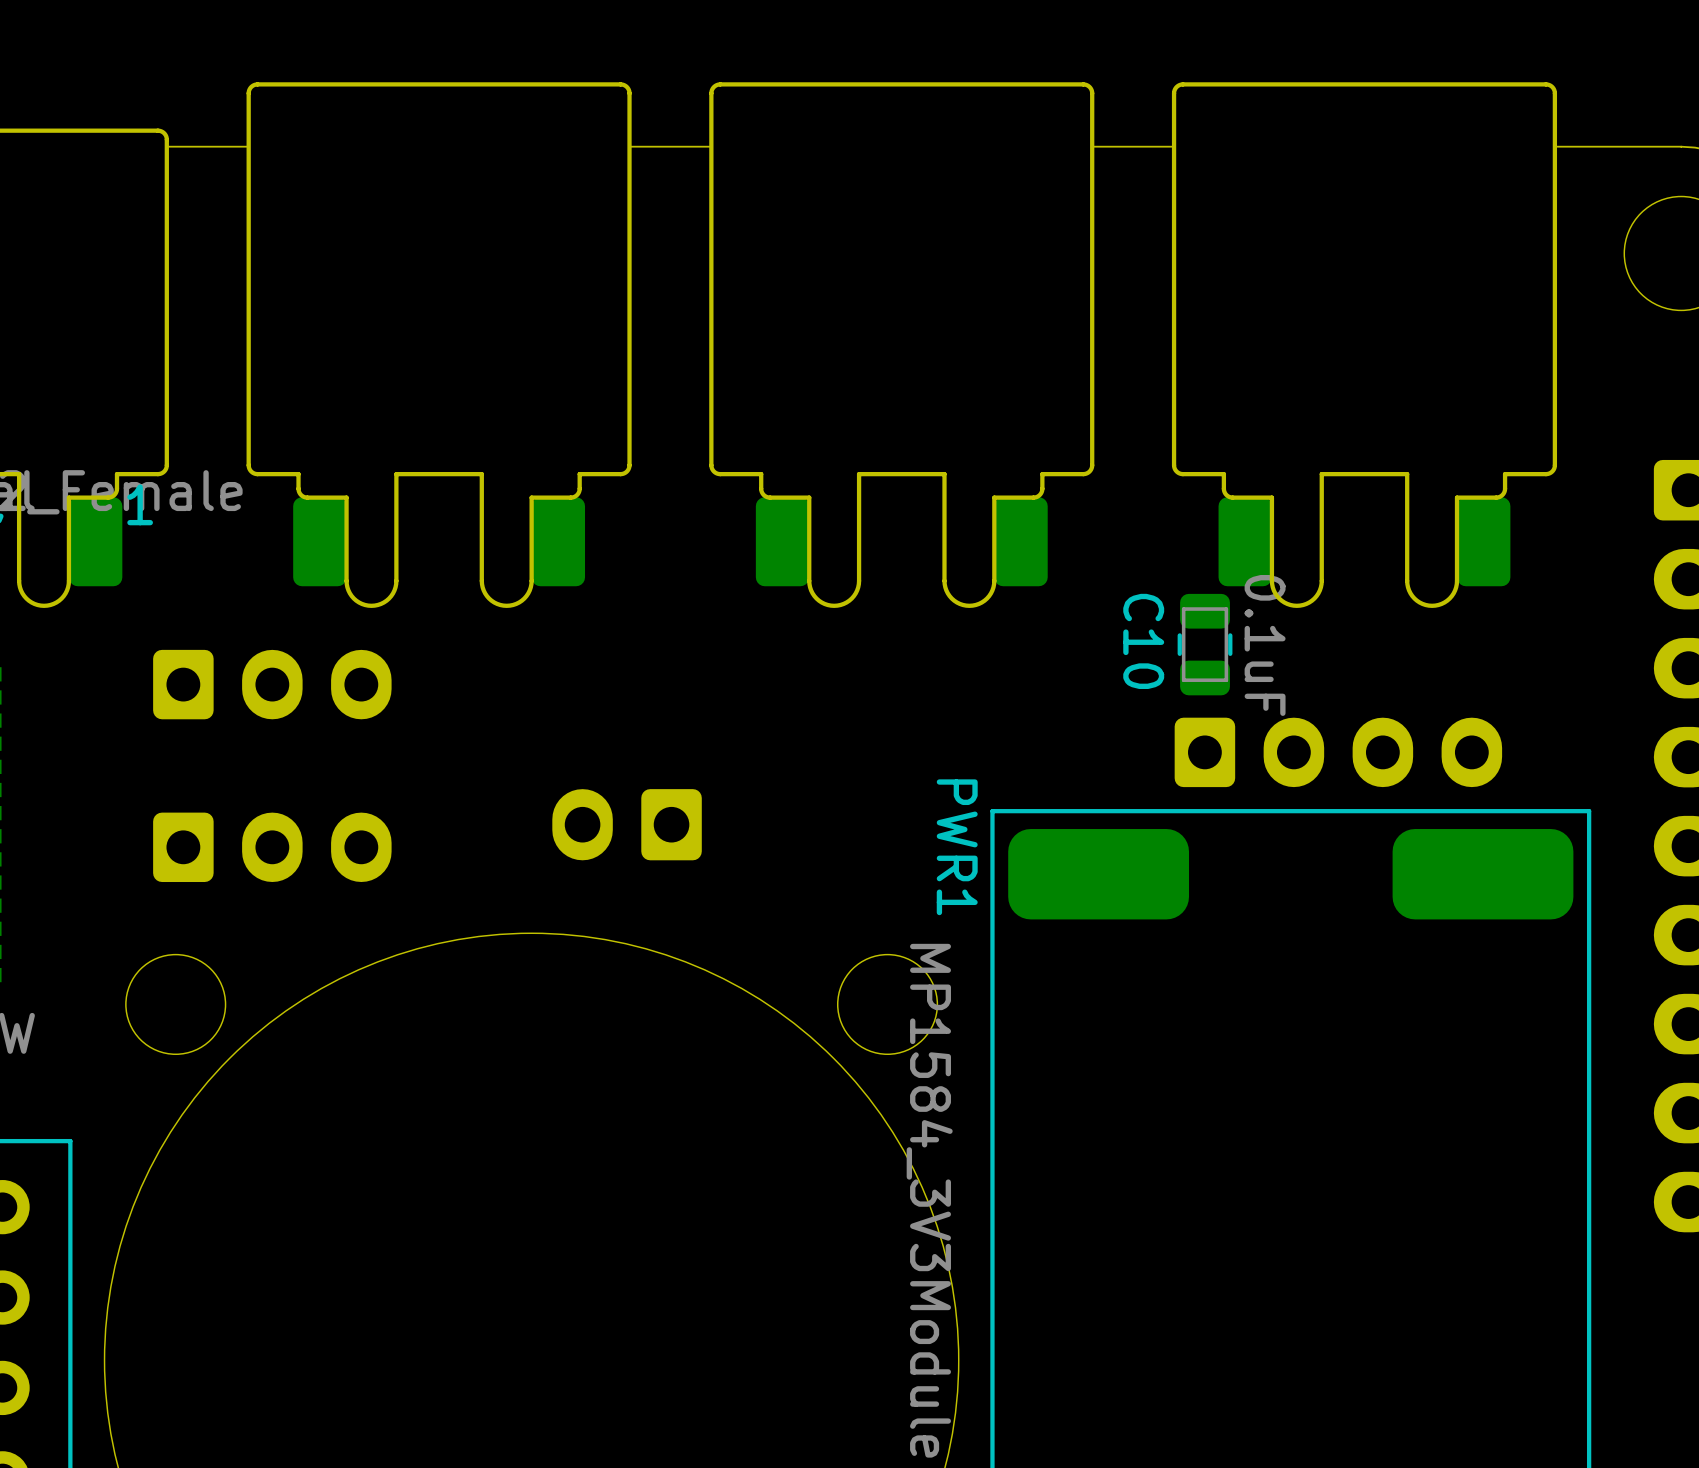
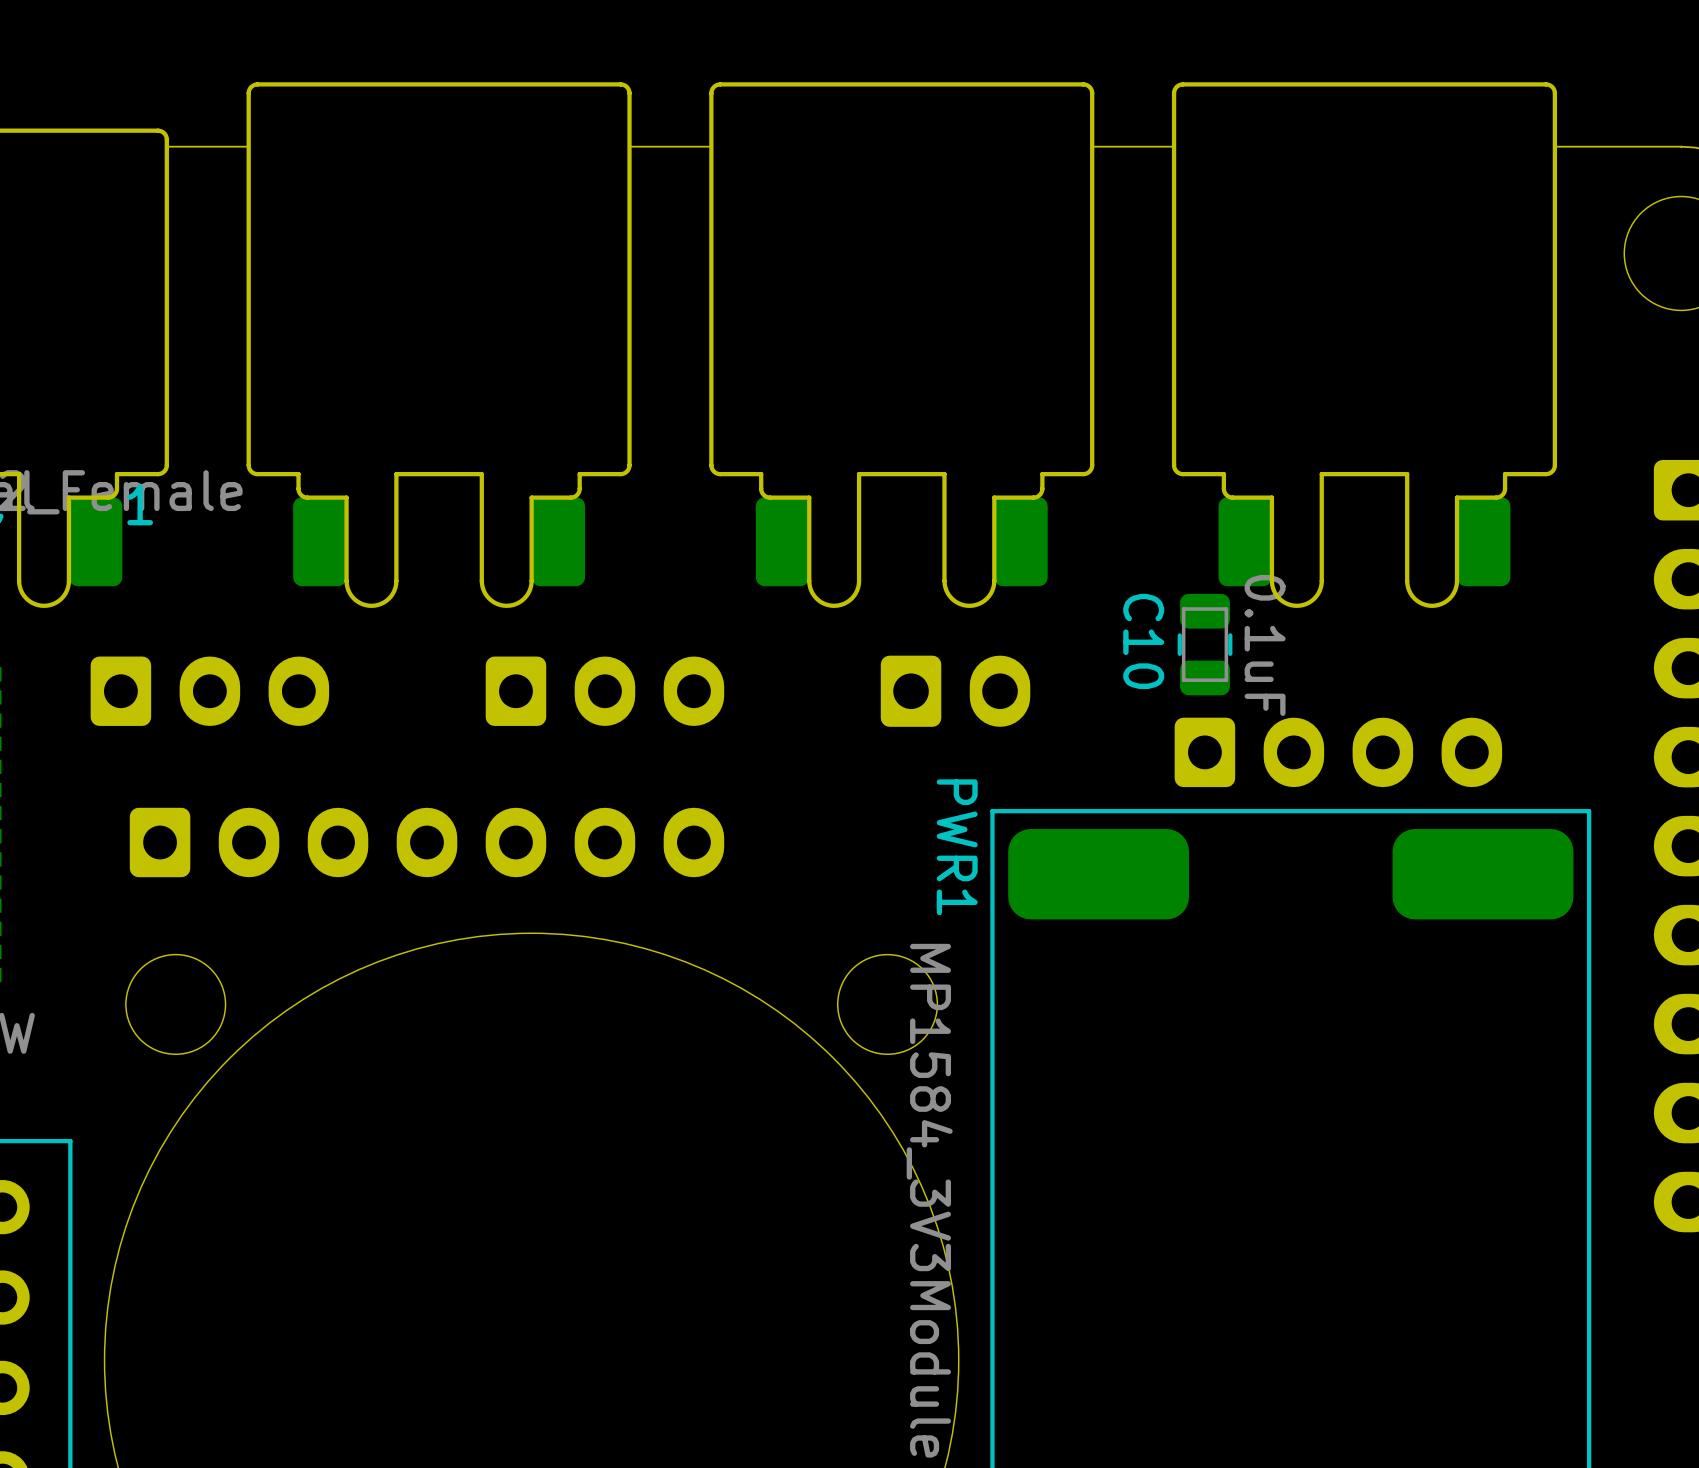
part position: (272, 684) -> (209, 691)
part: none -> (604, 691)
part rotation: 0° (627, 824) -> 180° (955, 691)
part position: (627, 824) -> (955, 691)
part: none -> (426, 842)
part: (272, 847) -> none

